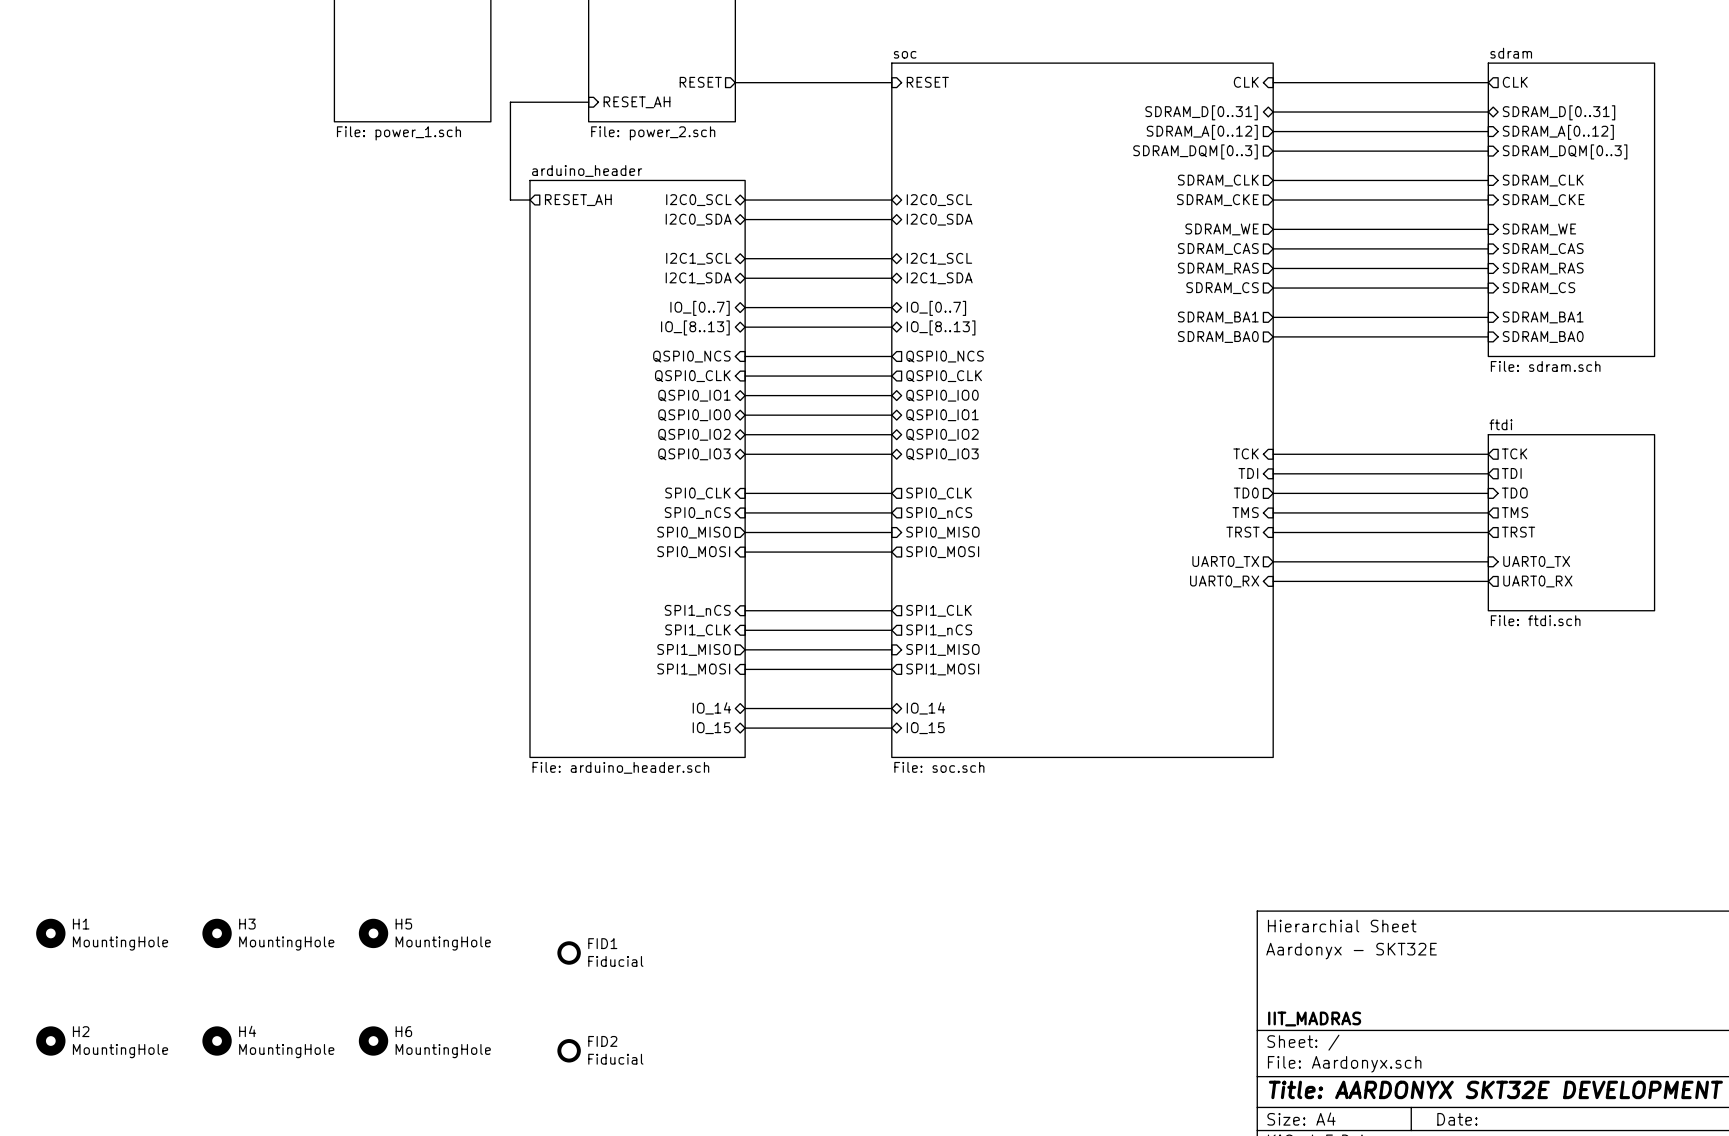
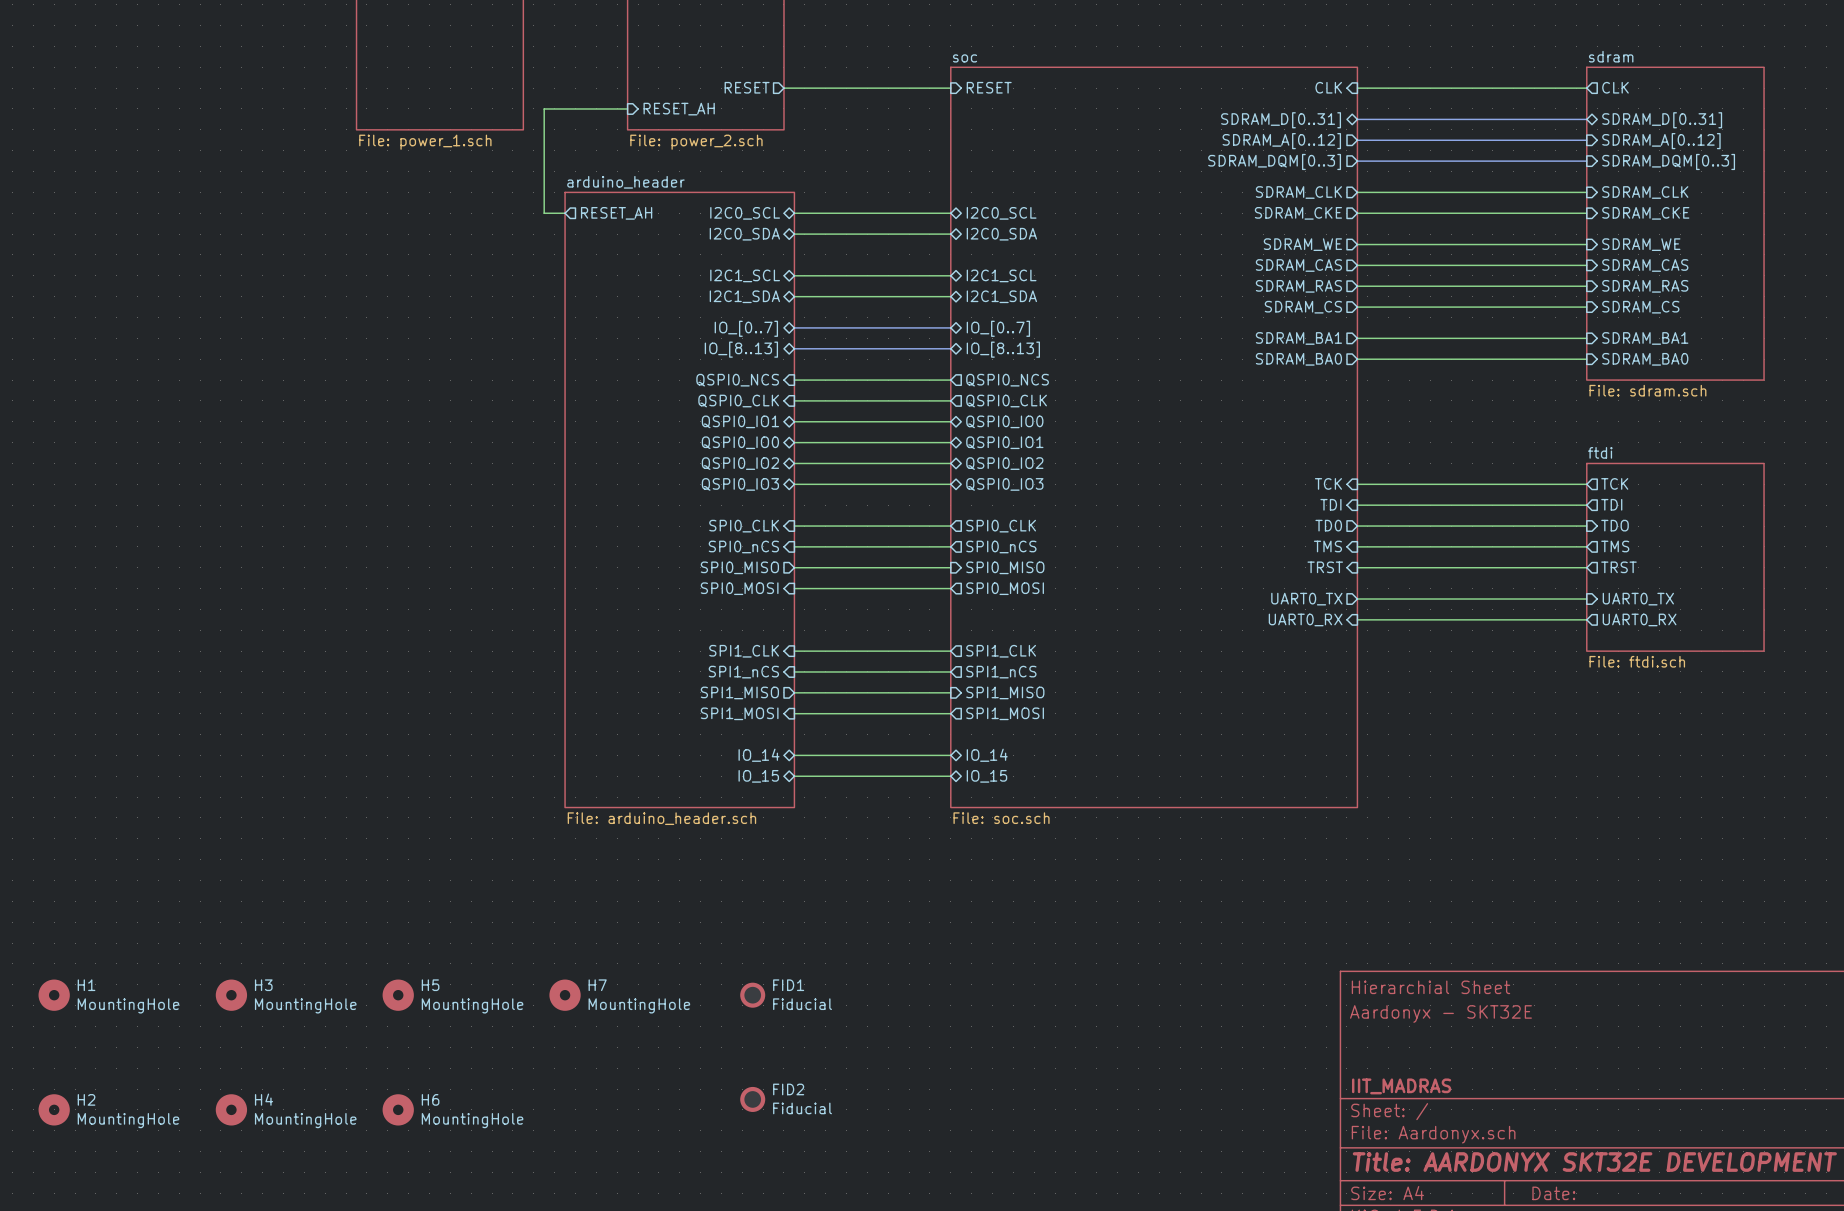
sheet pin: SPI1_nCS (697, 610) -> SPI1_CLK (744, 651)
sheet pin: SPI1_CLK (697, 630) -> SPI1_nCS (743, 672)
H7: none -> MountingHole (565, 995)
FID1 position: (569, 952) -> (752, 995)
FID2 position: (569, 1050) -> (752, 1099)

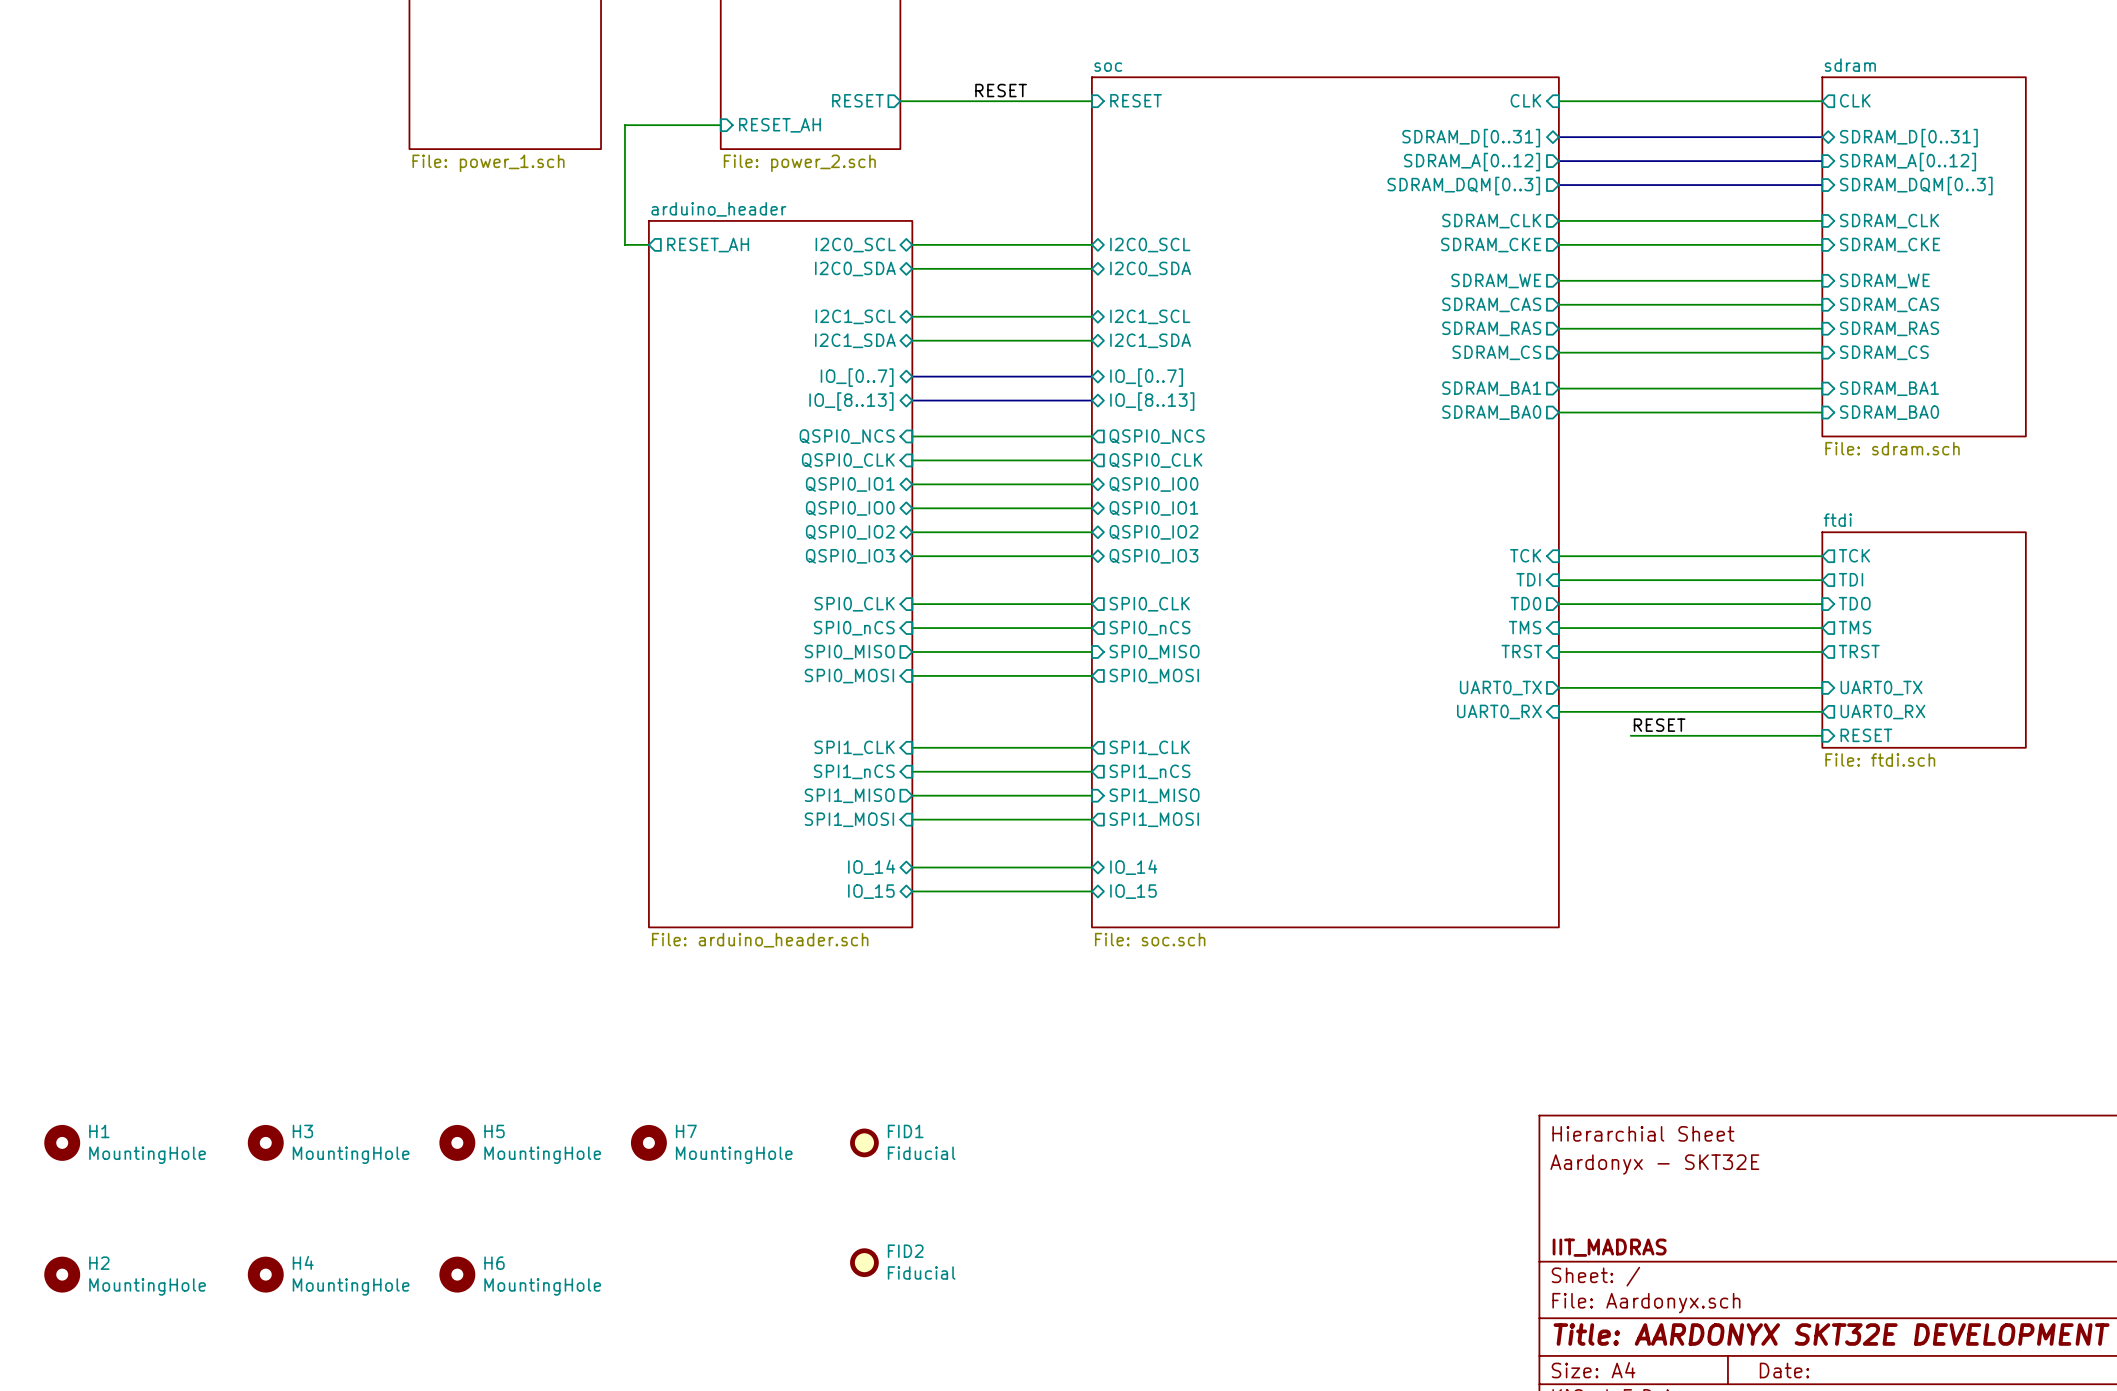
label: none -> RESET (1001, 90)
label: none -> RESET (1659, 725)
wire: none -> (1630, 735) (1822, 735)
sheet pin: none -> RESET (1866, 735)

